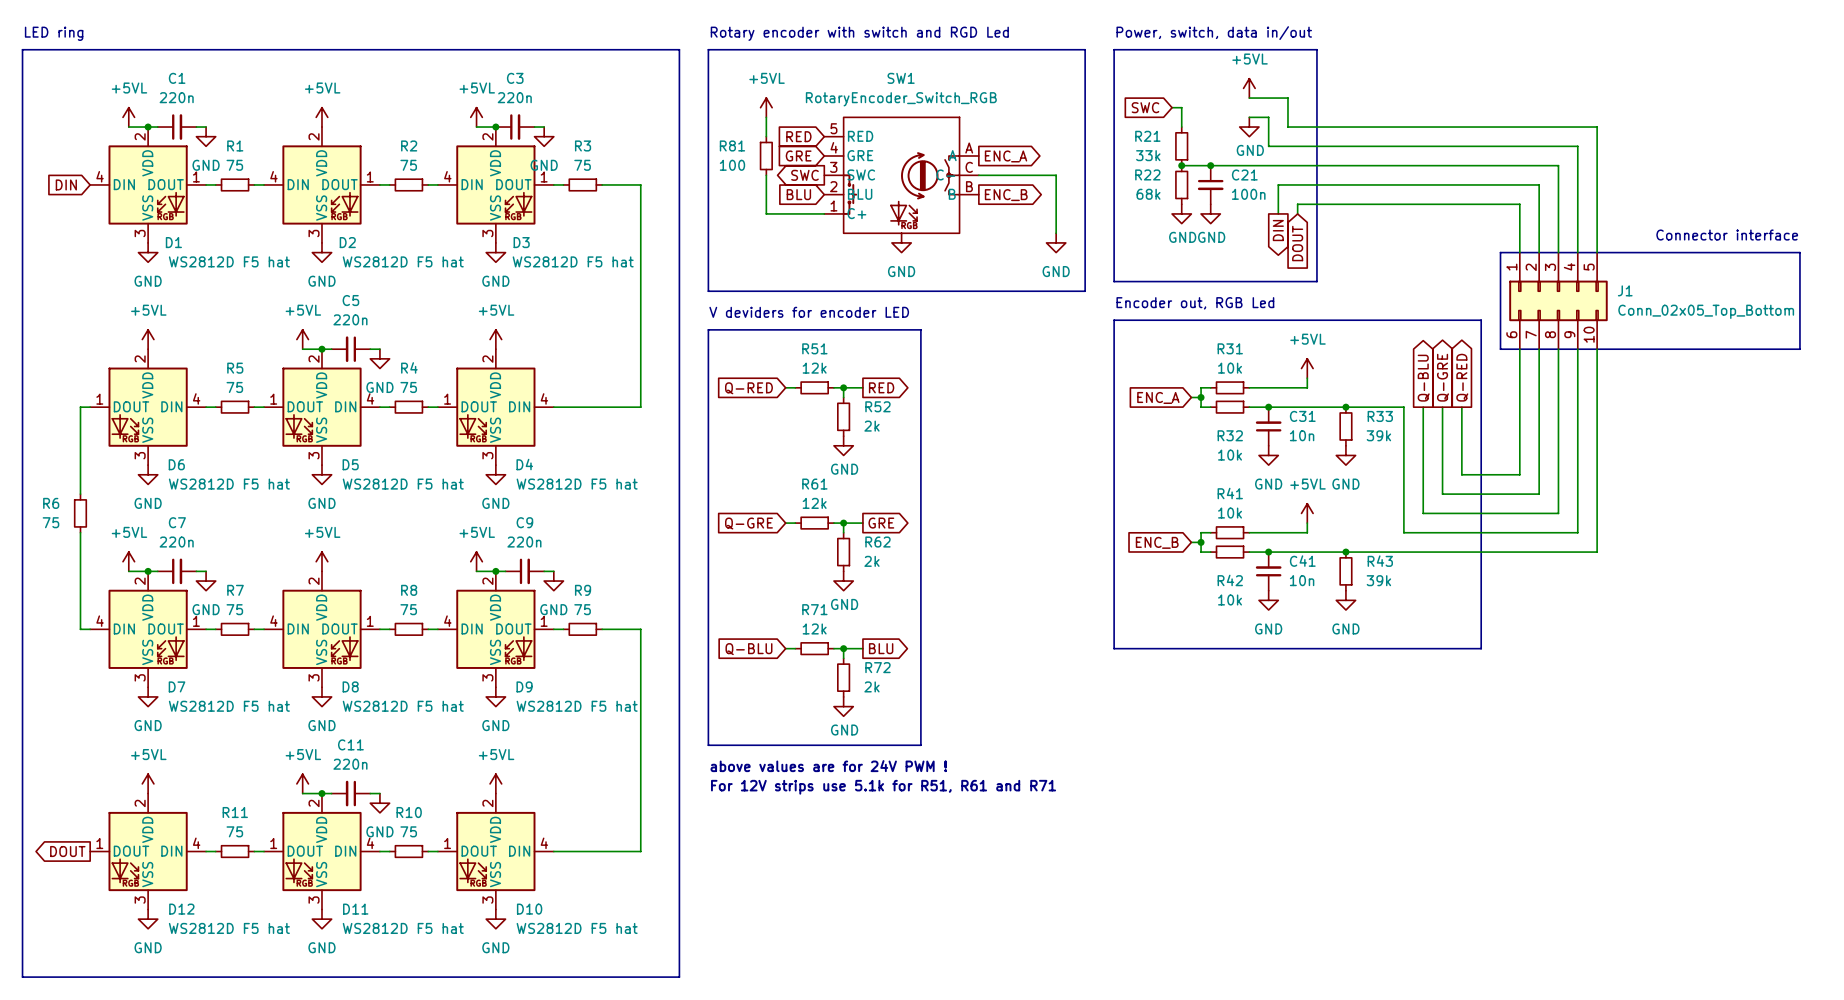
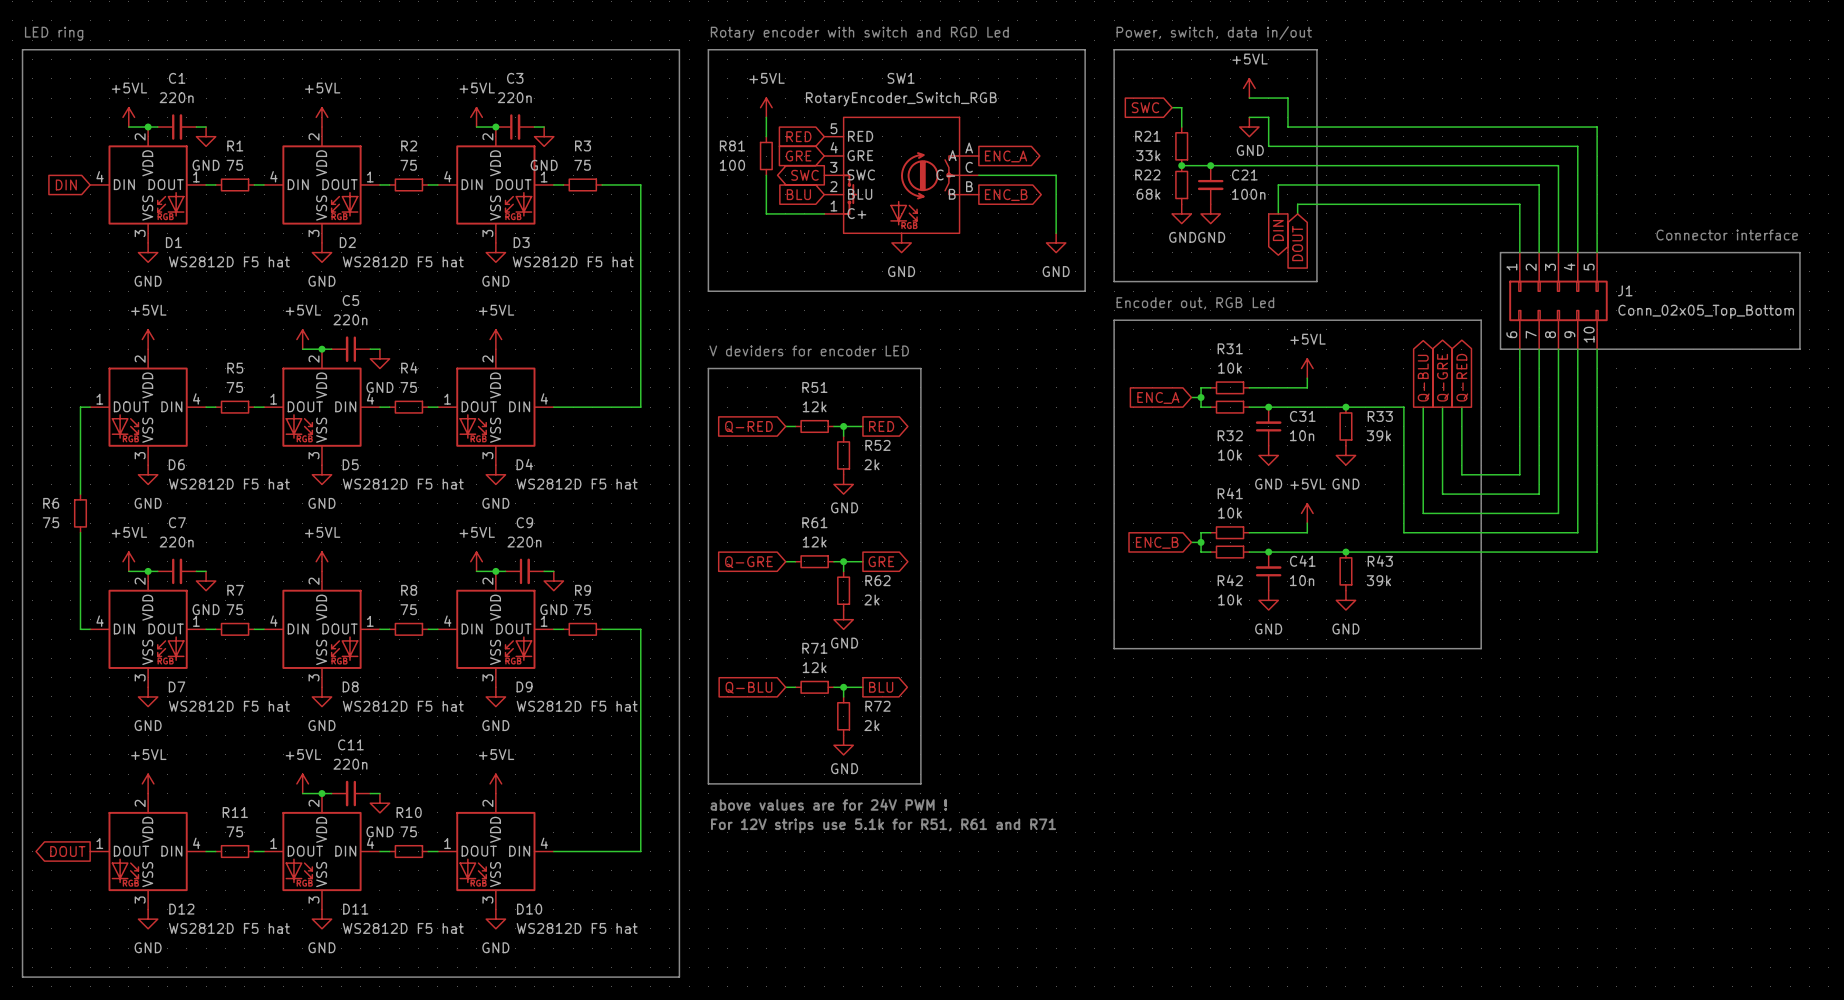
text position: V deviders for encoder LED (809, 312) -> V deviders for encoder LED (809, 350)
line: (708, 368) (708, 329) (920, 329) (920, 368) -> (708, 368) (920, 368)
wire: (785, 387) (795, 387) -> (785, 426) (795, 426)
R51 position: (814, 387) -> (814, 426)
wire: (833, 387) (862, 387) -> (833, 426) (862, 426)
junction position: (843, 387) -> (843, 426)
global label position: RED (881, 387) -> RED (881, 426)
global label position: Q-RED (748, 388) -> Q-RED (748, 426)
R52 position: (843, 416) -> (843, 455)
power symbol position: GND (843, 445) -> GND (843, 484)
global label position: Q-GRE (748, 523) -> Q-GRE (748, 562)
wire: (785, 523) (795, 523) -> (785, 561) (795, 561)
R61 position: (814, 523) -> (814, 561)
wire: (833, 523) (862, 523) -> (833, 561) (862, 561)
junction position: (843, 523) -> (843, 561)
global label position: GRE (881, 523) -> GRE (881, 561)
R62 position: (843, 552) -> (843, 590)
power symbol position: GND (843, 581) -> GND (843, 619)
wire: (785, 648) (795, 648) -> (785, 687) (795, 687)
R71 position: (814, 648) -> (814, 687)
wire: (833, 648) (862, 648) -> (833, 687) (862, 687)
junction position: (843, 648) -> (843, 687)
global label position: BLU (881, 648) -> BLU (881, 687)
global label position: Q-BLU (748, 649) -> Q-BLU (748, 687)
R72 position: (843, 677) -> (843, 716)
power symbol position: GND (843, 706) -> GND (843, 745)
line: (708, 745) (920, 745) -> (708, 745) (708, 783) (920, 783) (920, 745)
text position: above values are for 24V PWM ! (828, 766) -> above values are for 24V PWM ! (828, 804)
text position: For 12V strips use 5.1k for R51, R61 and R71 (883, 787) -> For 12V strips use 5.1k for R51, R61 and R71 (883, 825)

